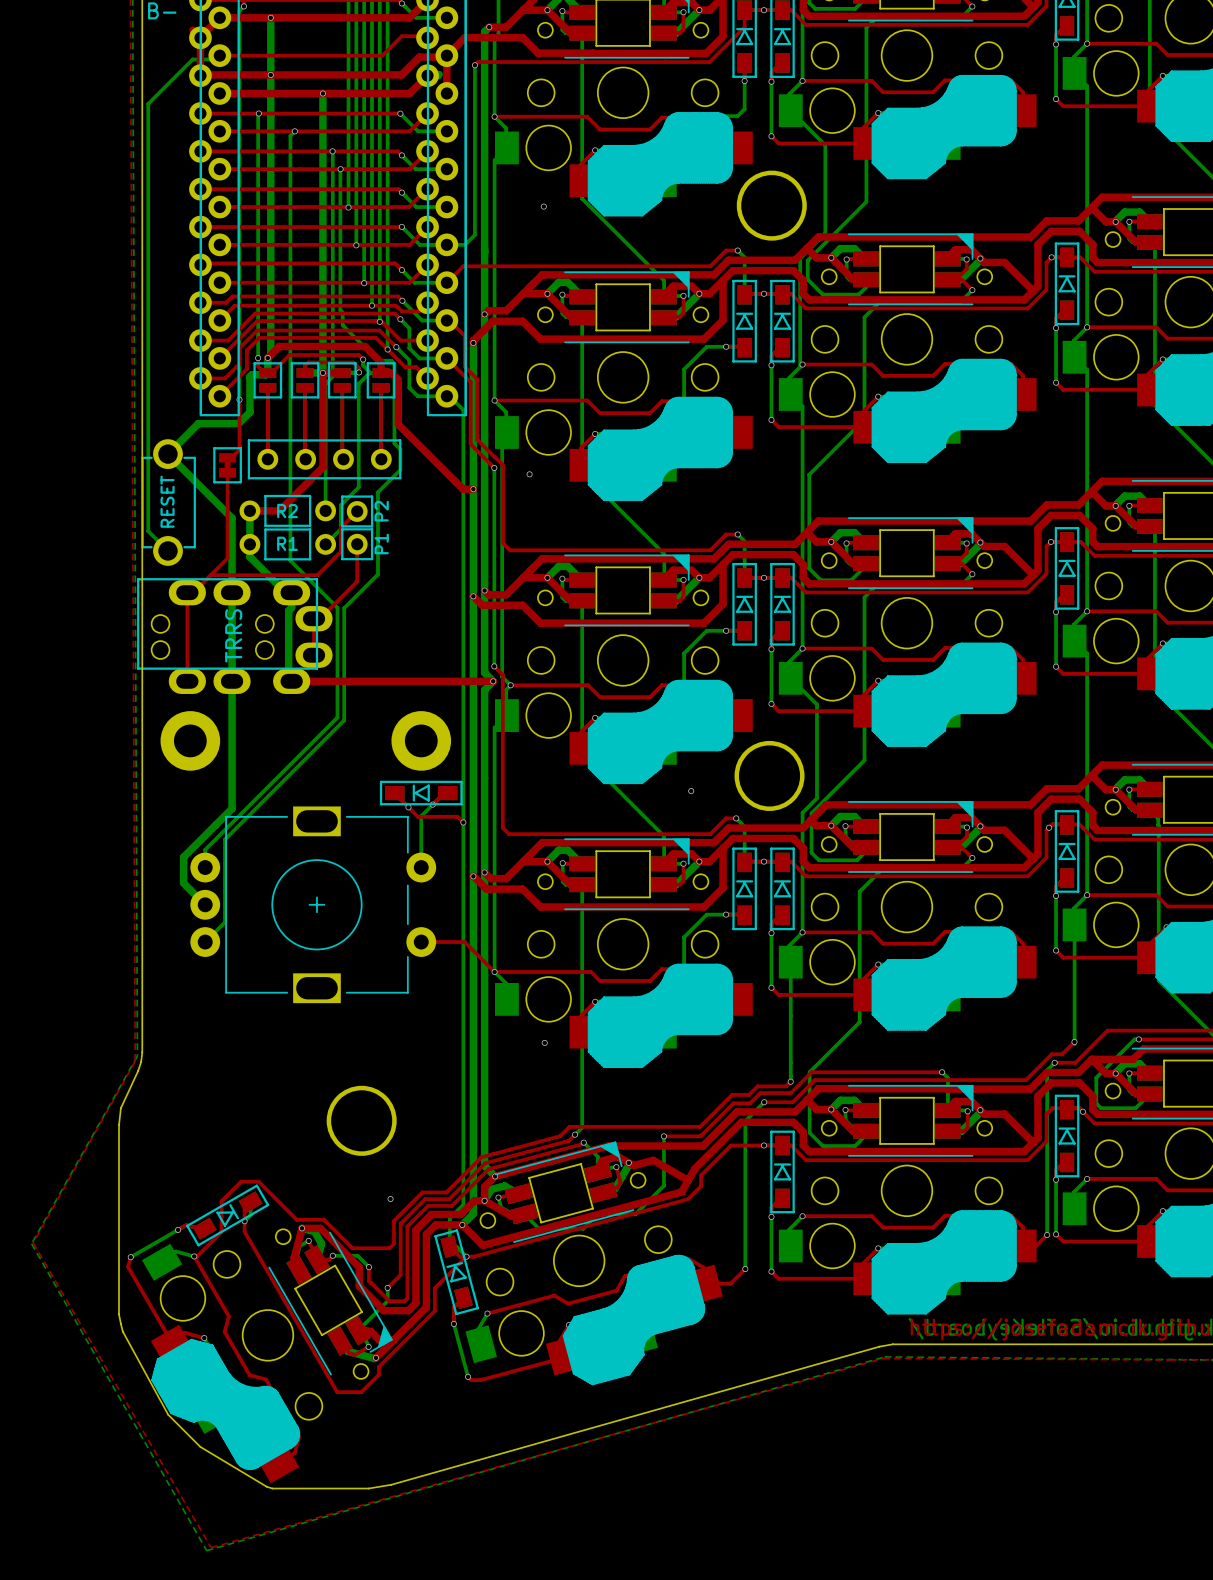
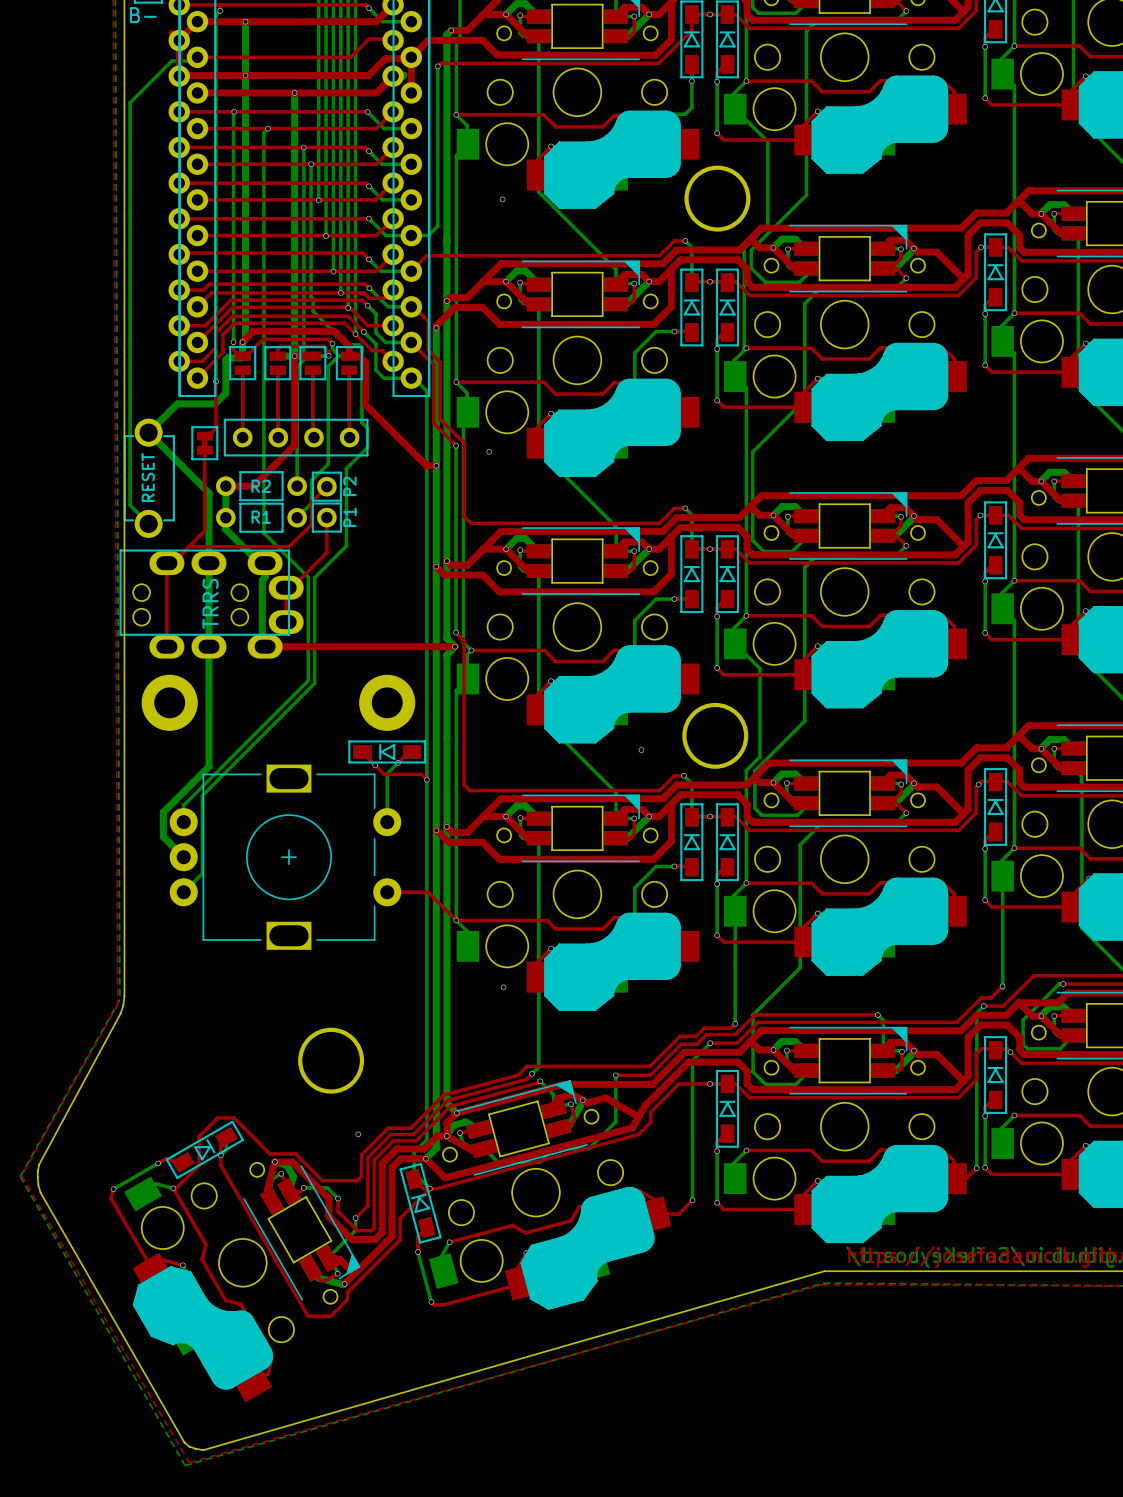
board edge: (138, 1070) (120, 1108) (119, 1125) (119, 1314) (122, 1331) (168, 1414) (200, 1446) (266, 1486) (272, 1488) (368, 1488) (391, 1484) (892, 1344) -> (120, 1013) (39, 1164) (38, 1185) (40, 1192) (184, 1442) (189, 1446) (203, 1450) (824, 1271) (831, 1271)

